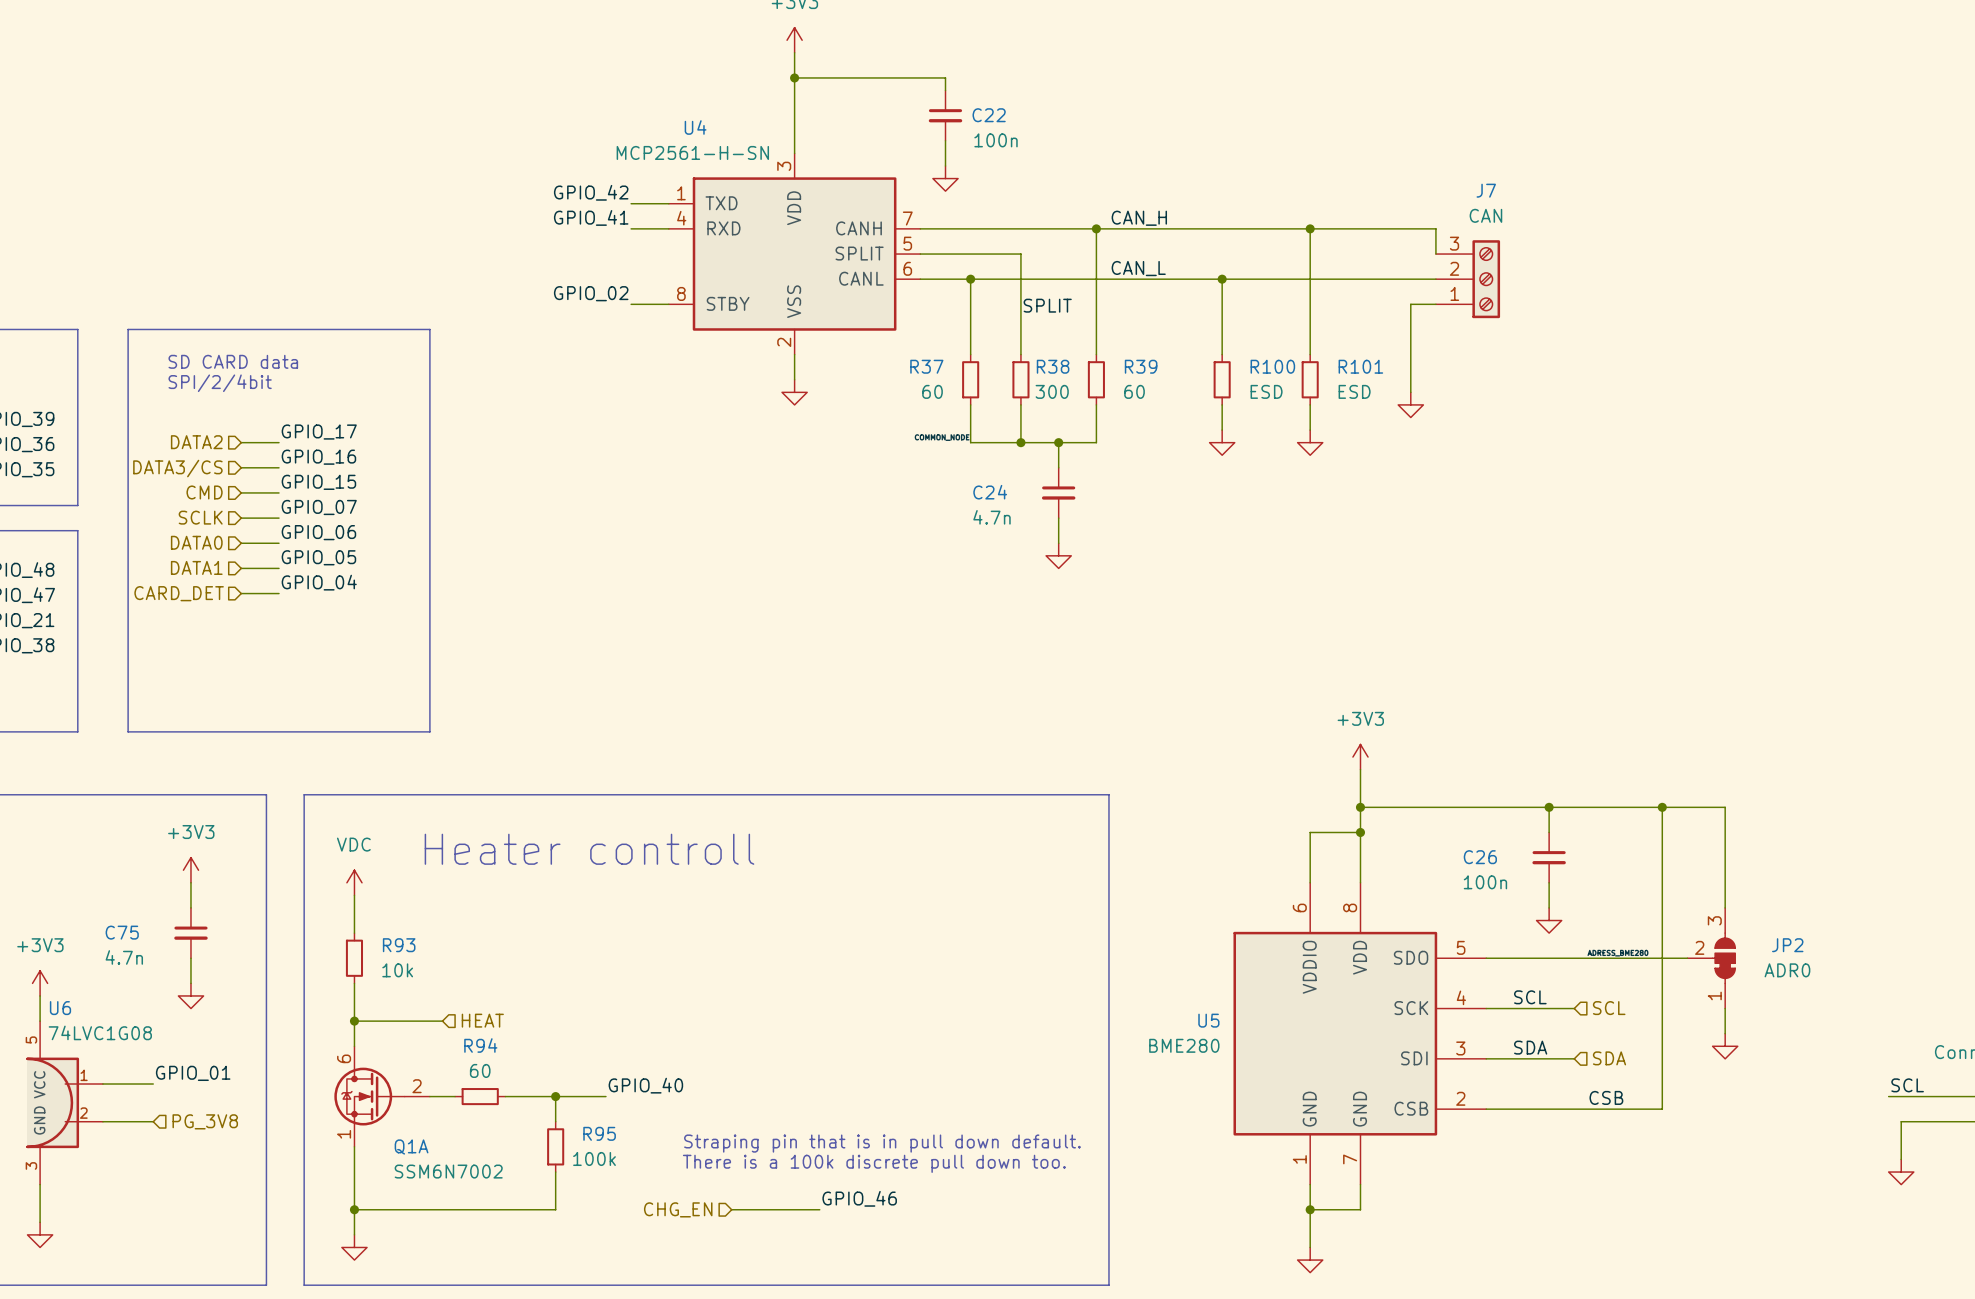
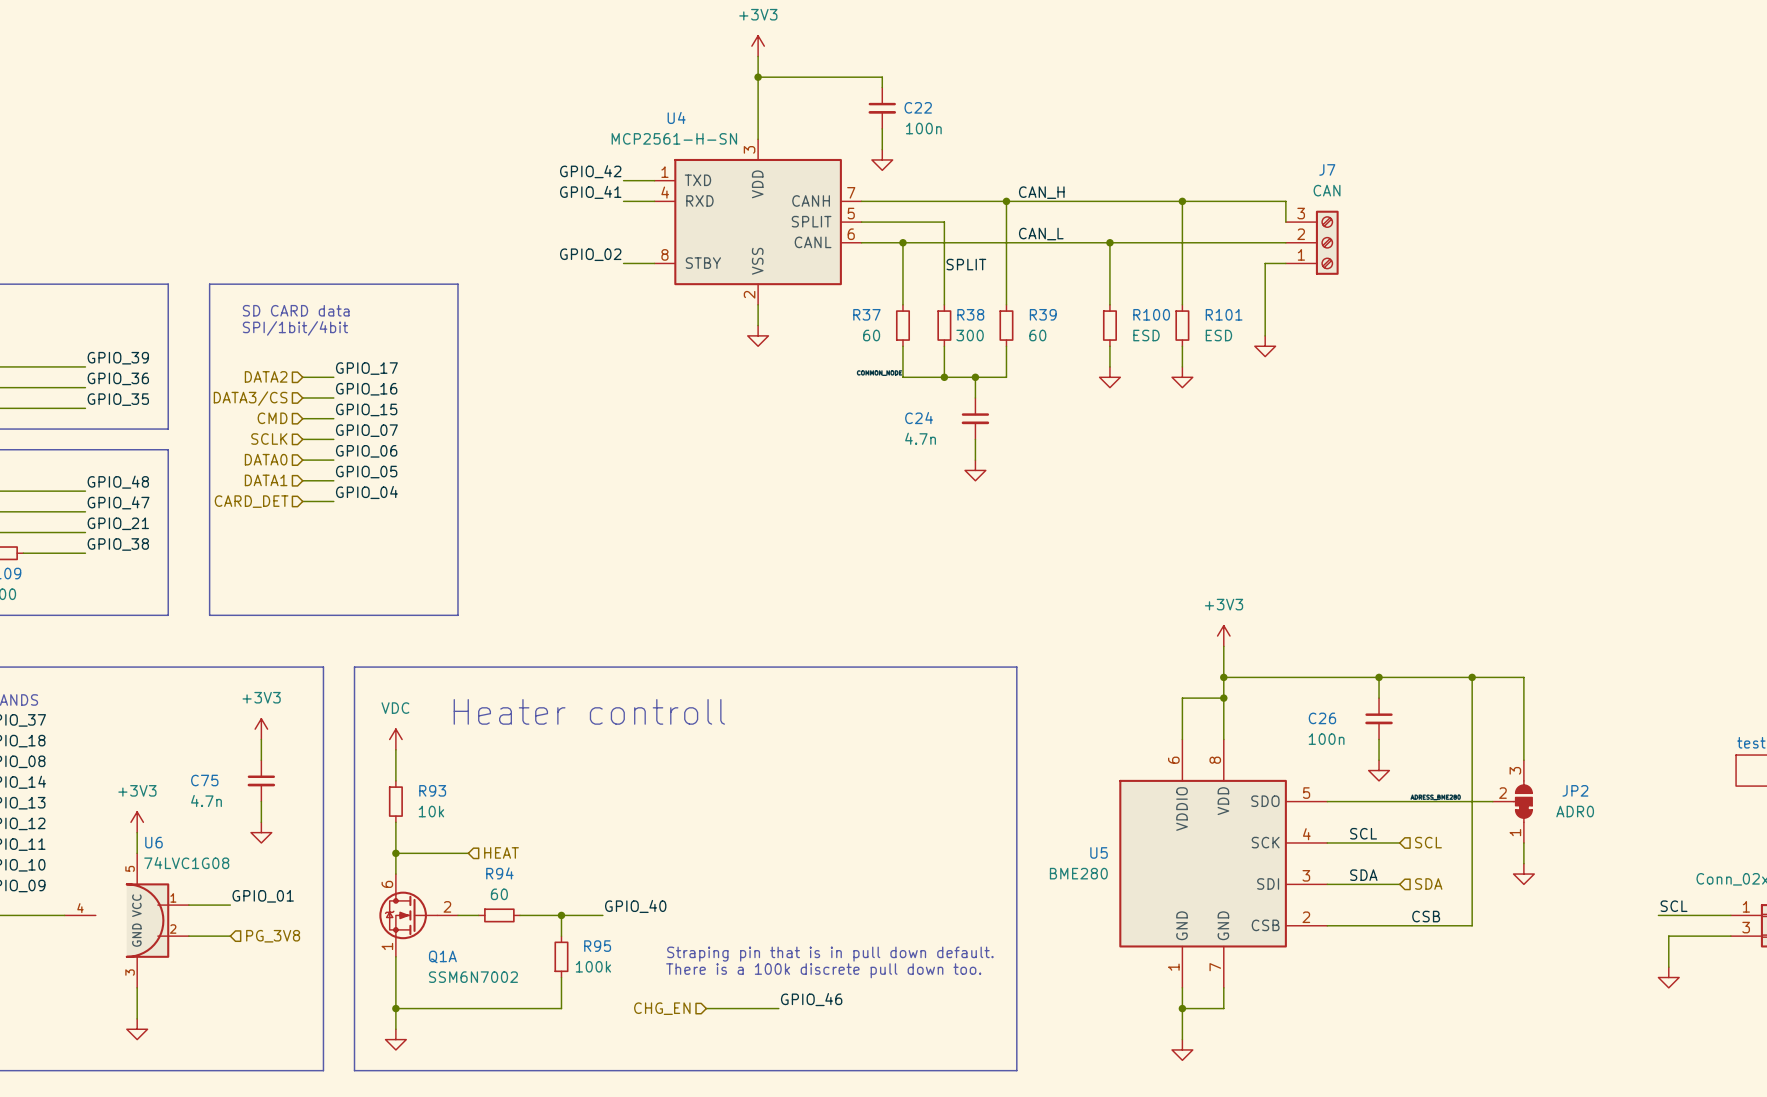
text: SPI/2/4bit (220, 383) -> SPI/1bit/4bit (295, 328)

